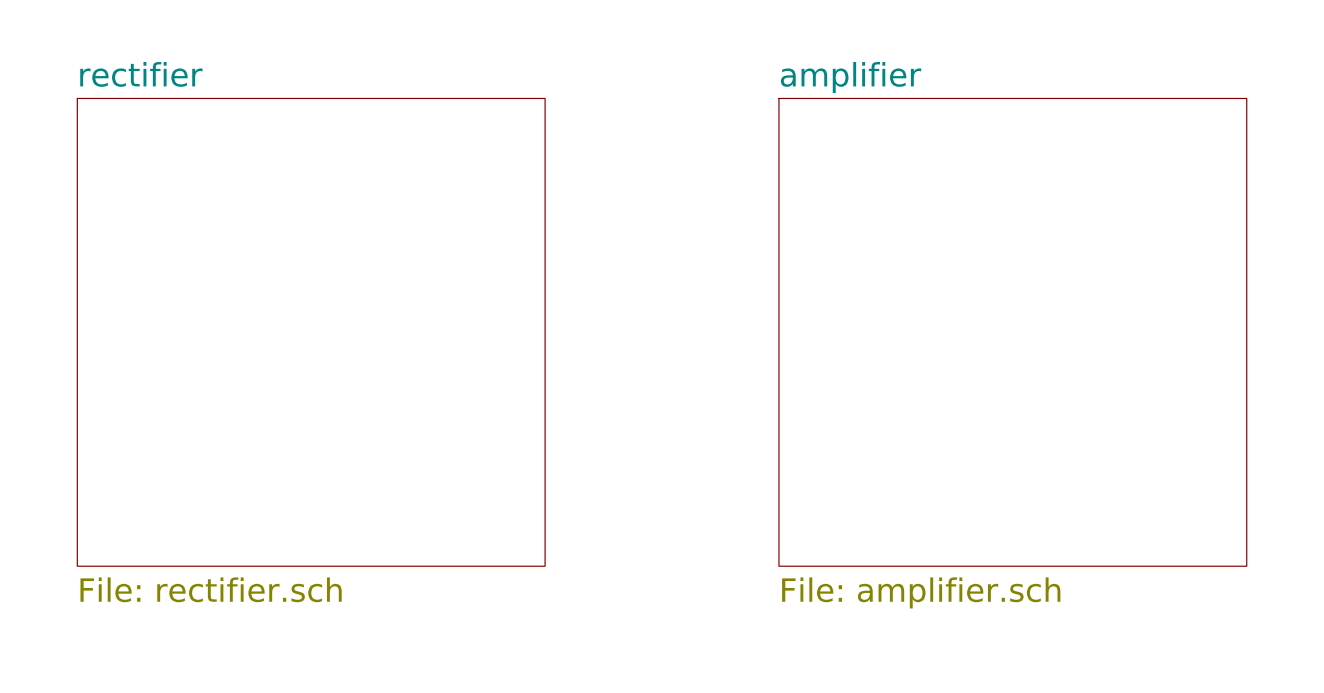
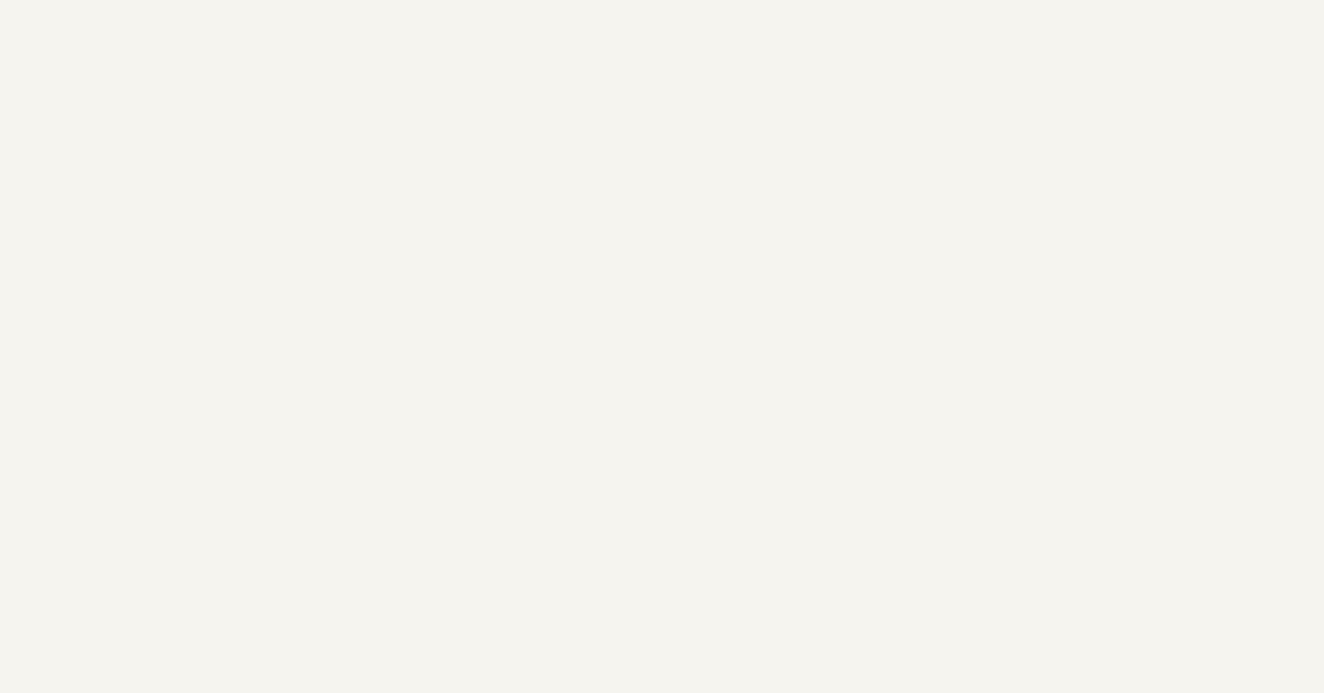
sheet rectifier: File: rectifier.sch (311, 332) -> none
sheet amplifier: File: amplifier.sch (1012, 332) -> none

